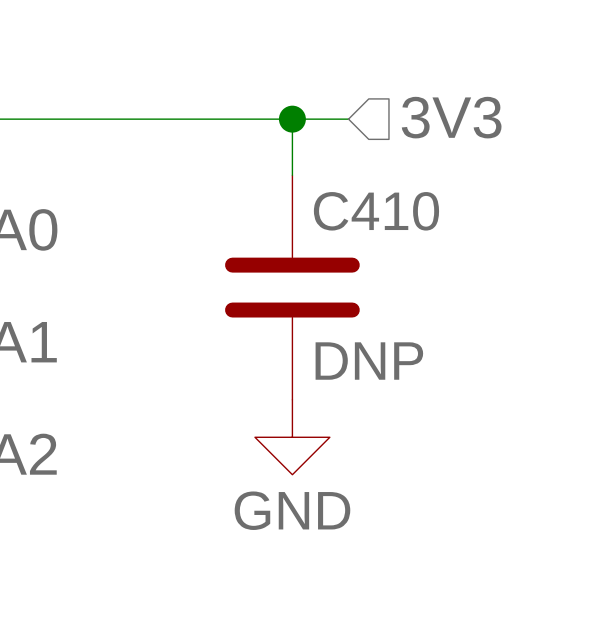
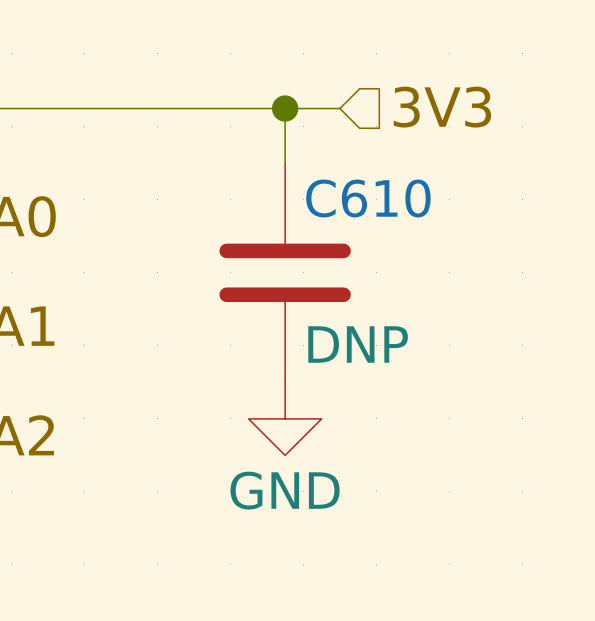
C410 name: C410 (376, 211) -> C610 (368, 198)

